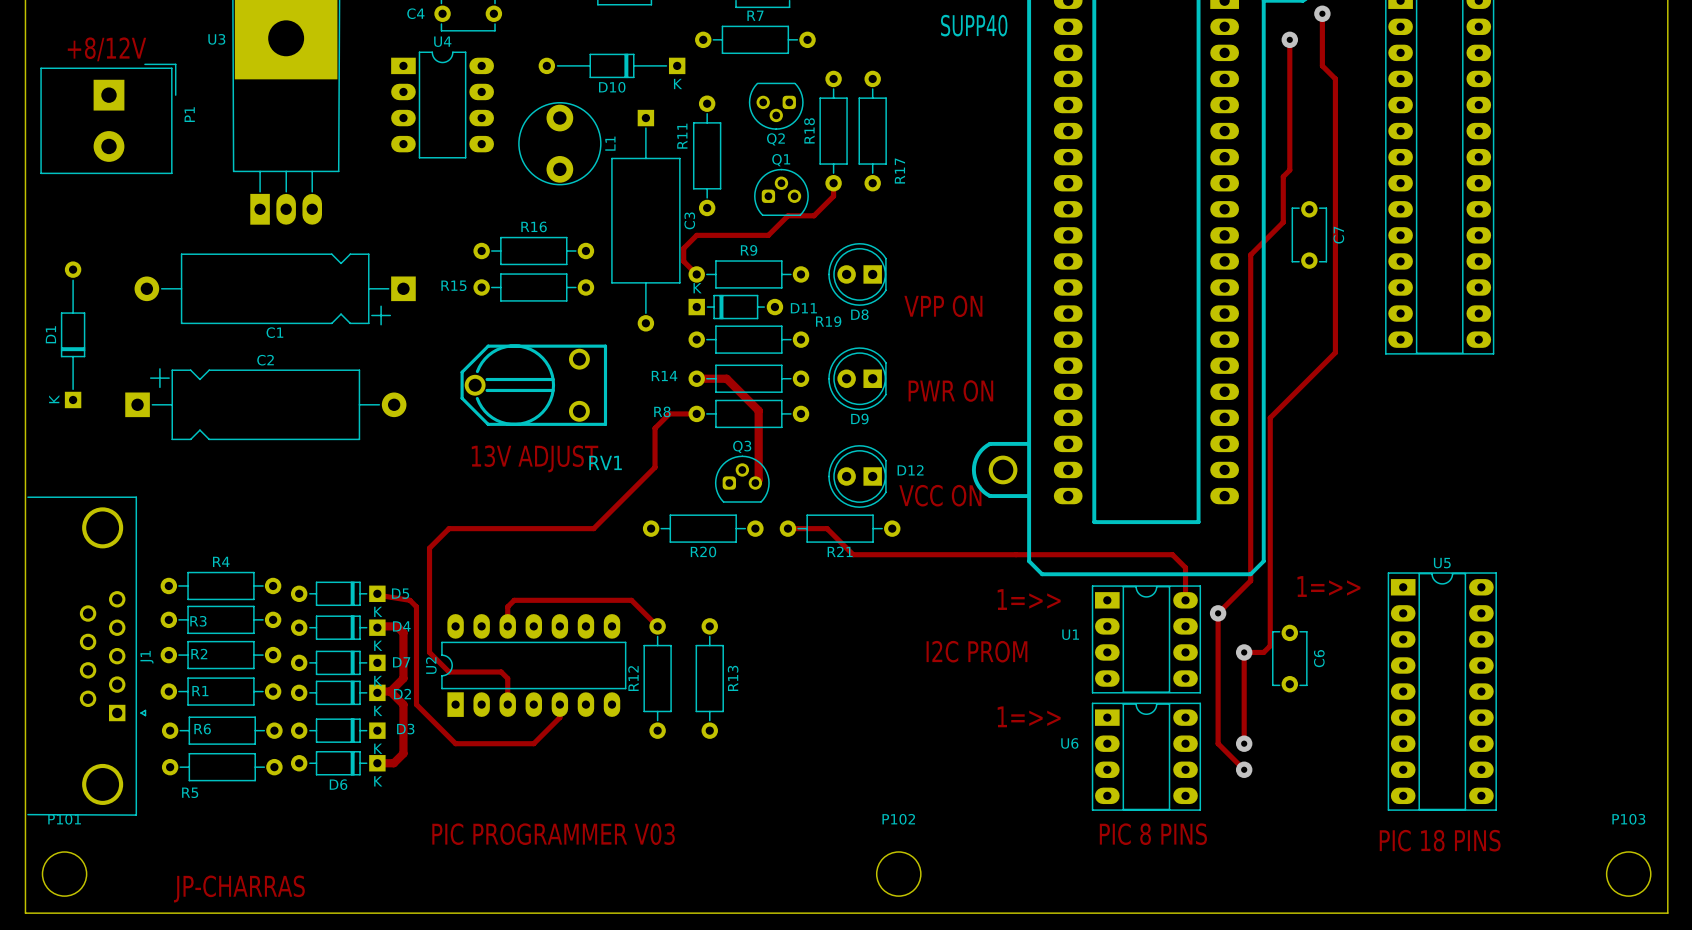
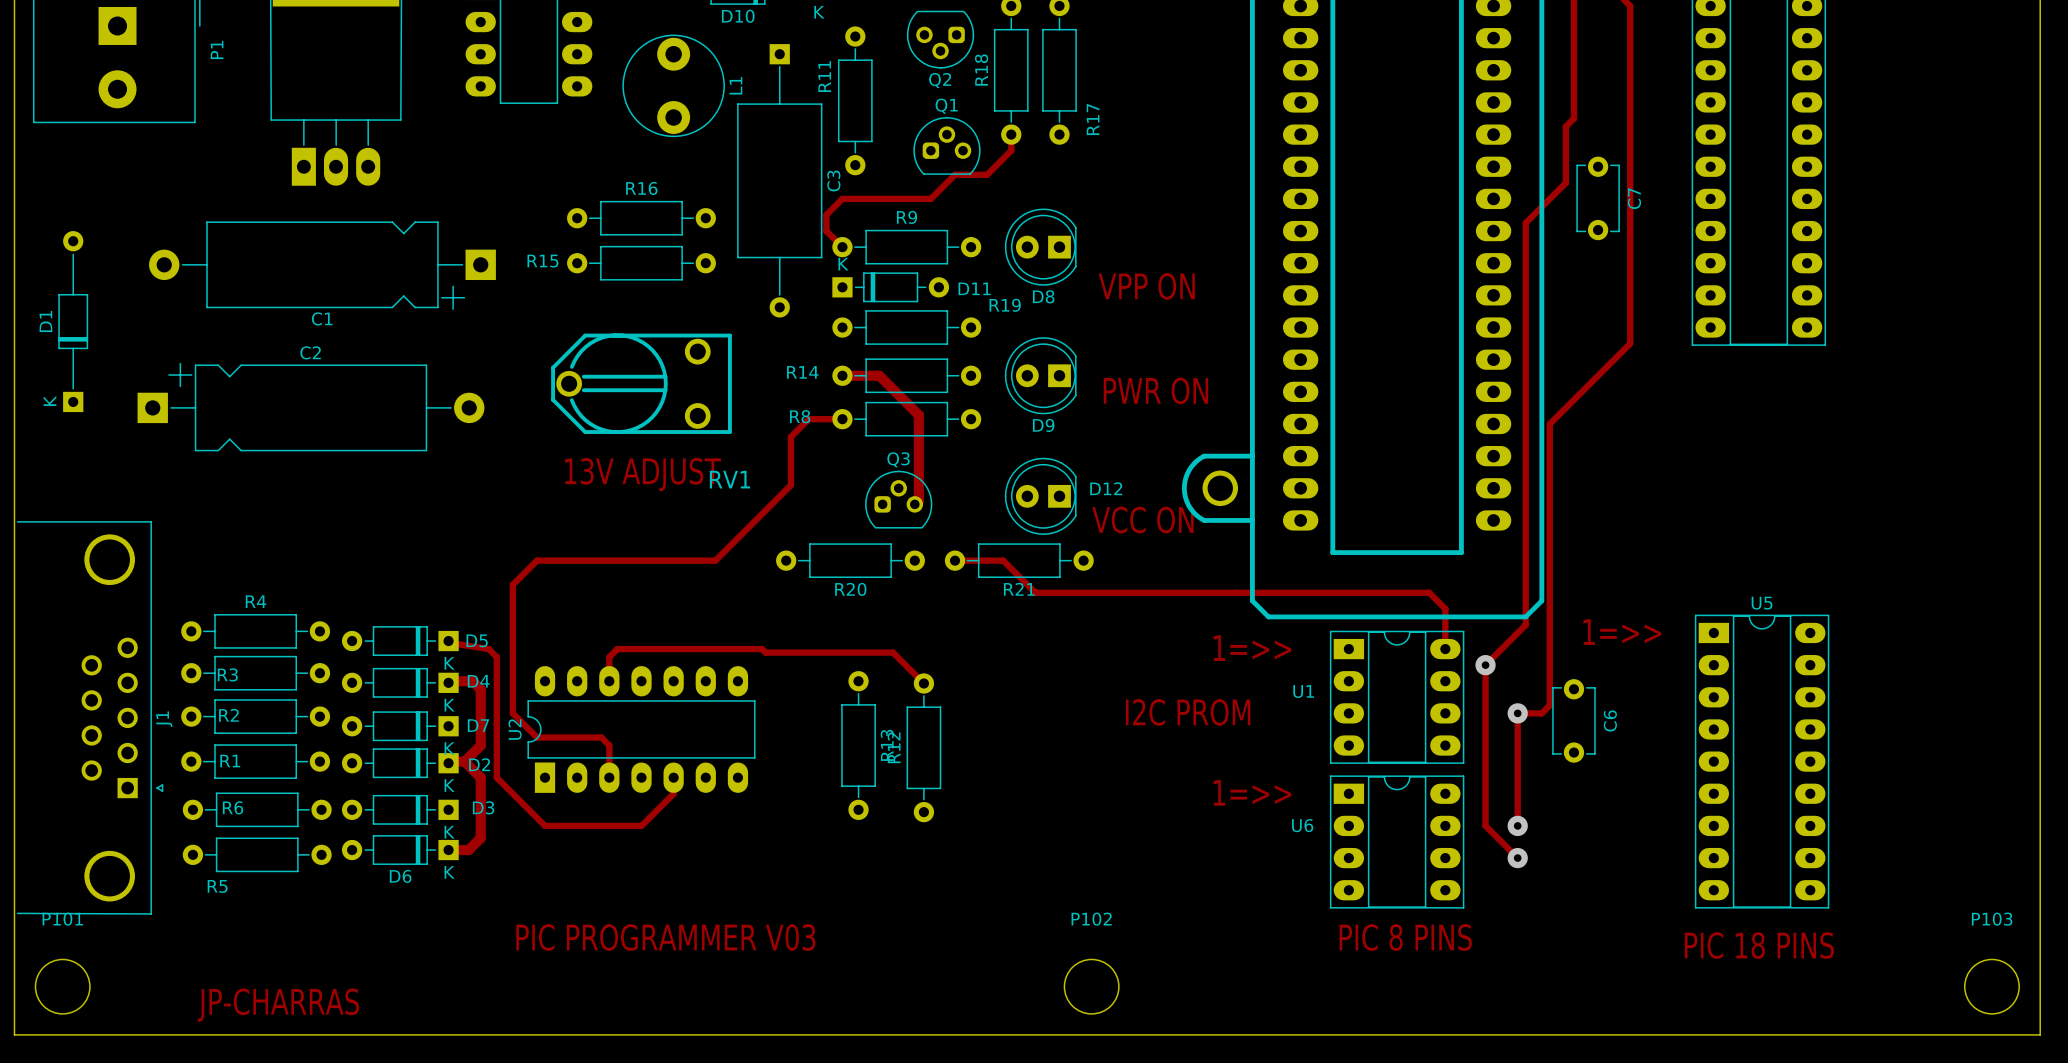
track: (634, 603) (657, 626) -> (765, 652) (893, 652) (923, 683)
R12 position: (657, 678) -> (923, 747)

